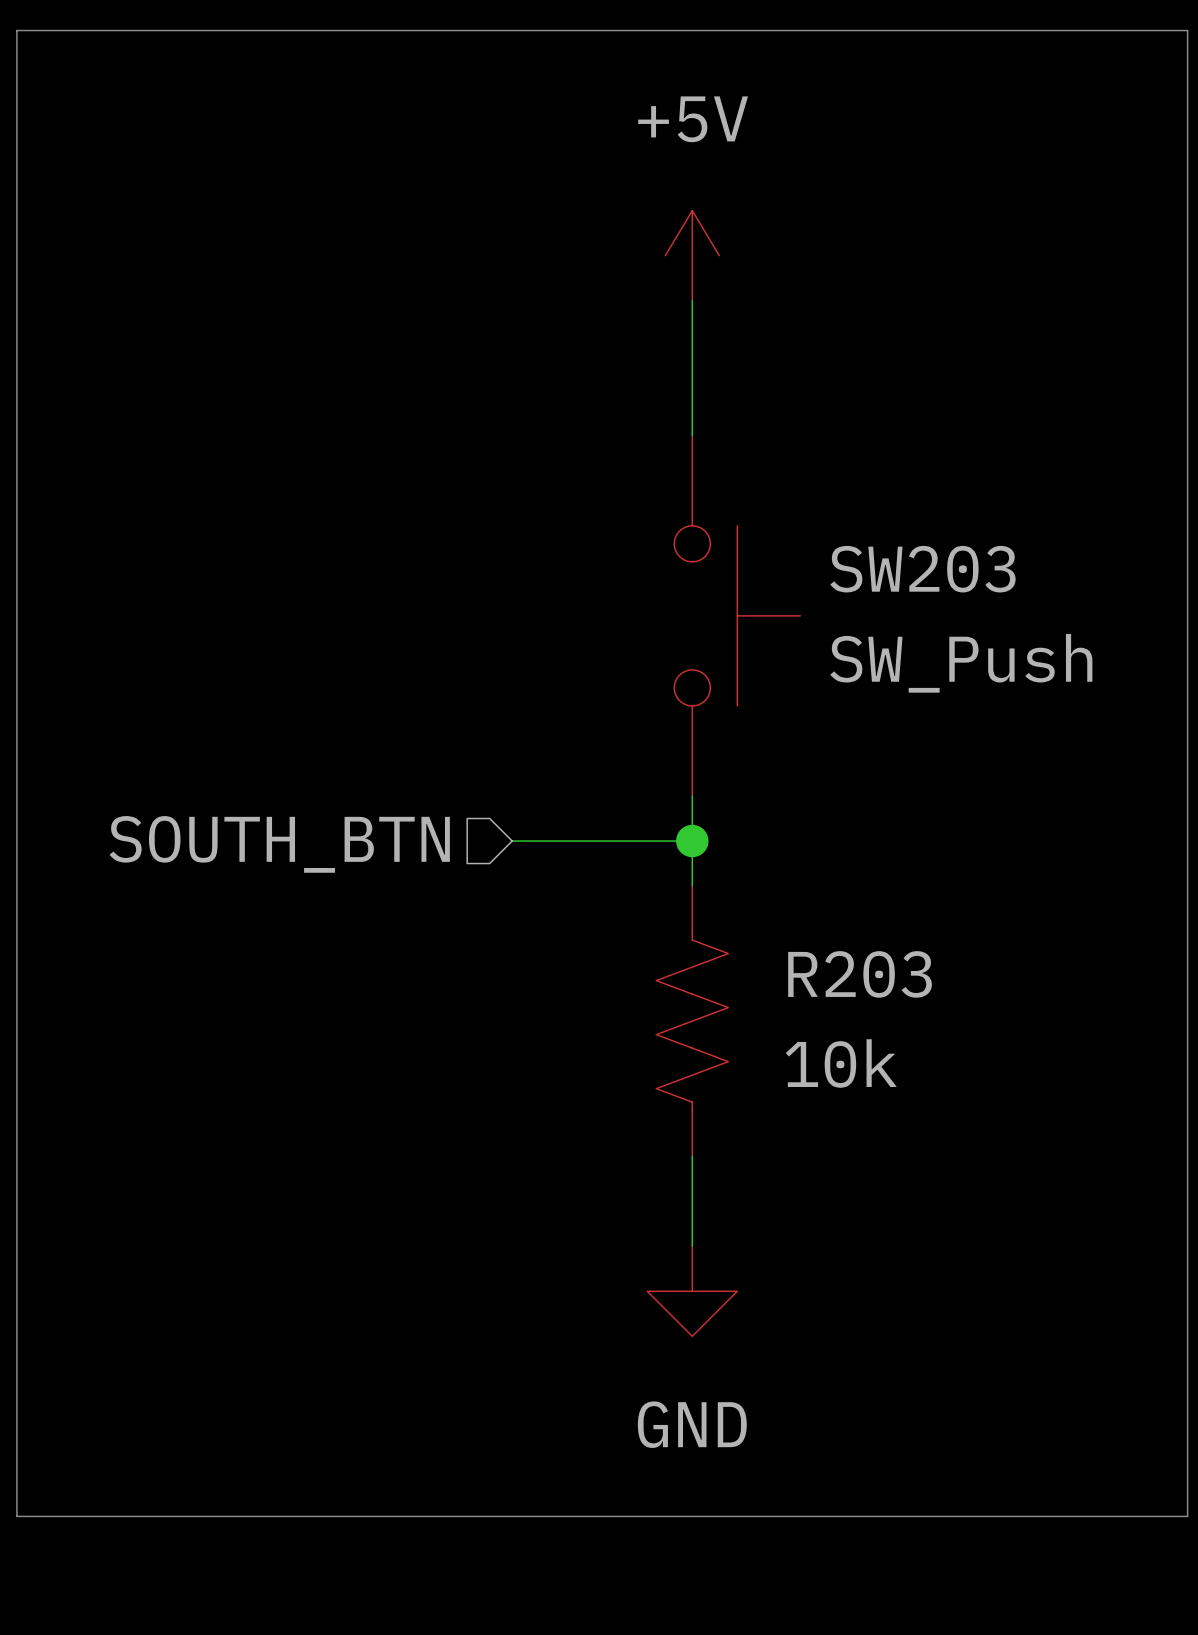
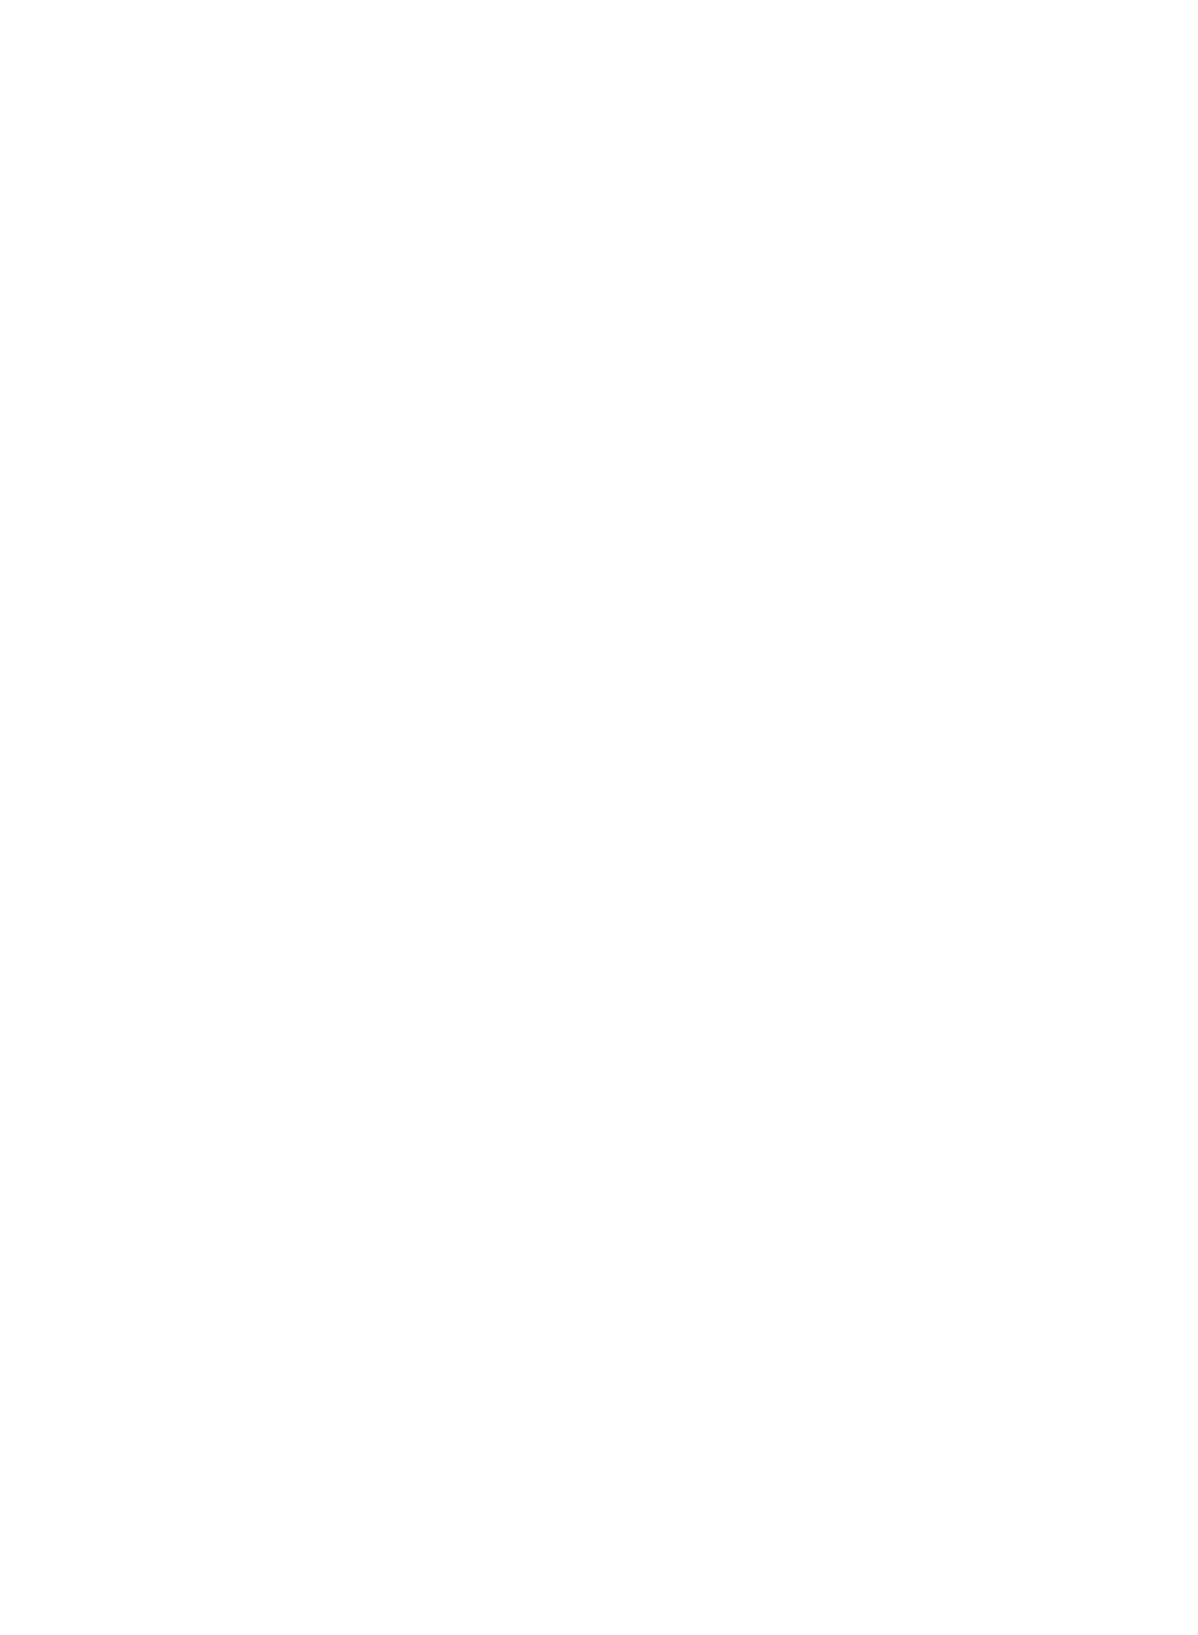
line: (16, 30) (1187, 30) (1187, 1516) (16, 1516) (16, 30) -> none
power symbol: +5V (692, 255) -> none
wire: (692, 300) (692, 435) -> none
SW203: SW_Push (737, 615) -> none
wire: (692, 796) (692, 886) -> none
wire: (512, 841) (692, 841) -> none
junction: (692, 841) -> none
hierarchical label: SOUTH_BTN (279, 844) -> none
R203: 10k (692, 1021) -> none
wire: (692, 1156) (692, 1246) -> none
power symbol: GND (692, 1291) -> none

